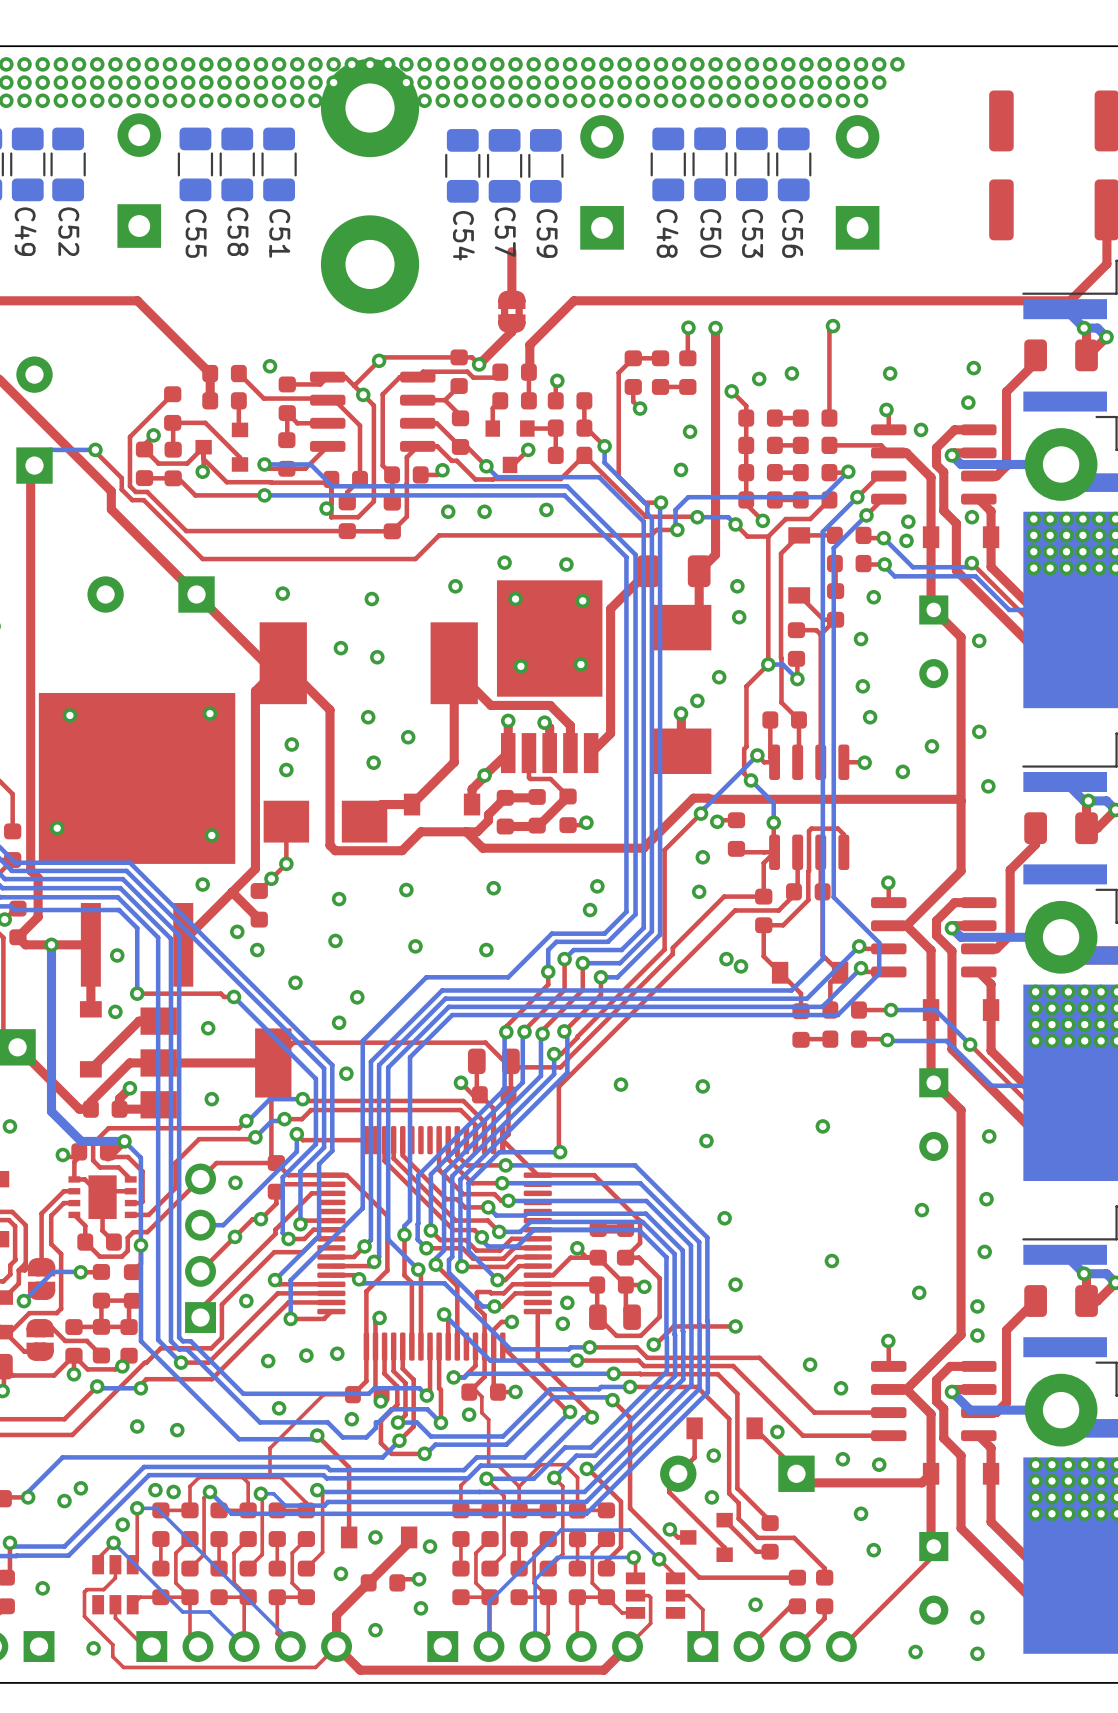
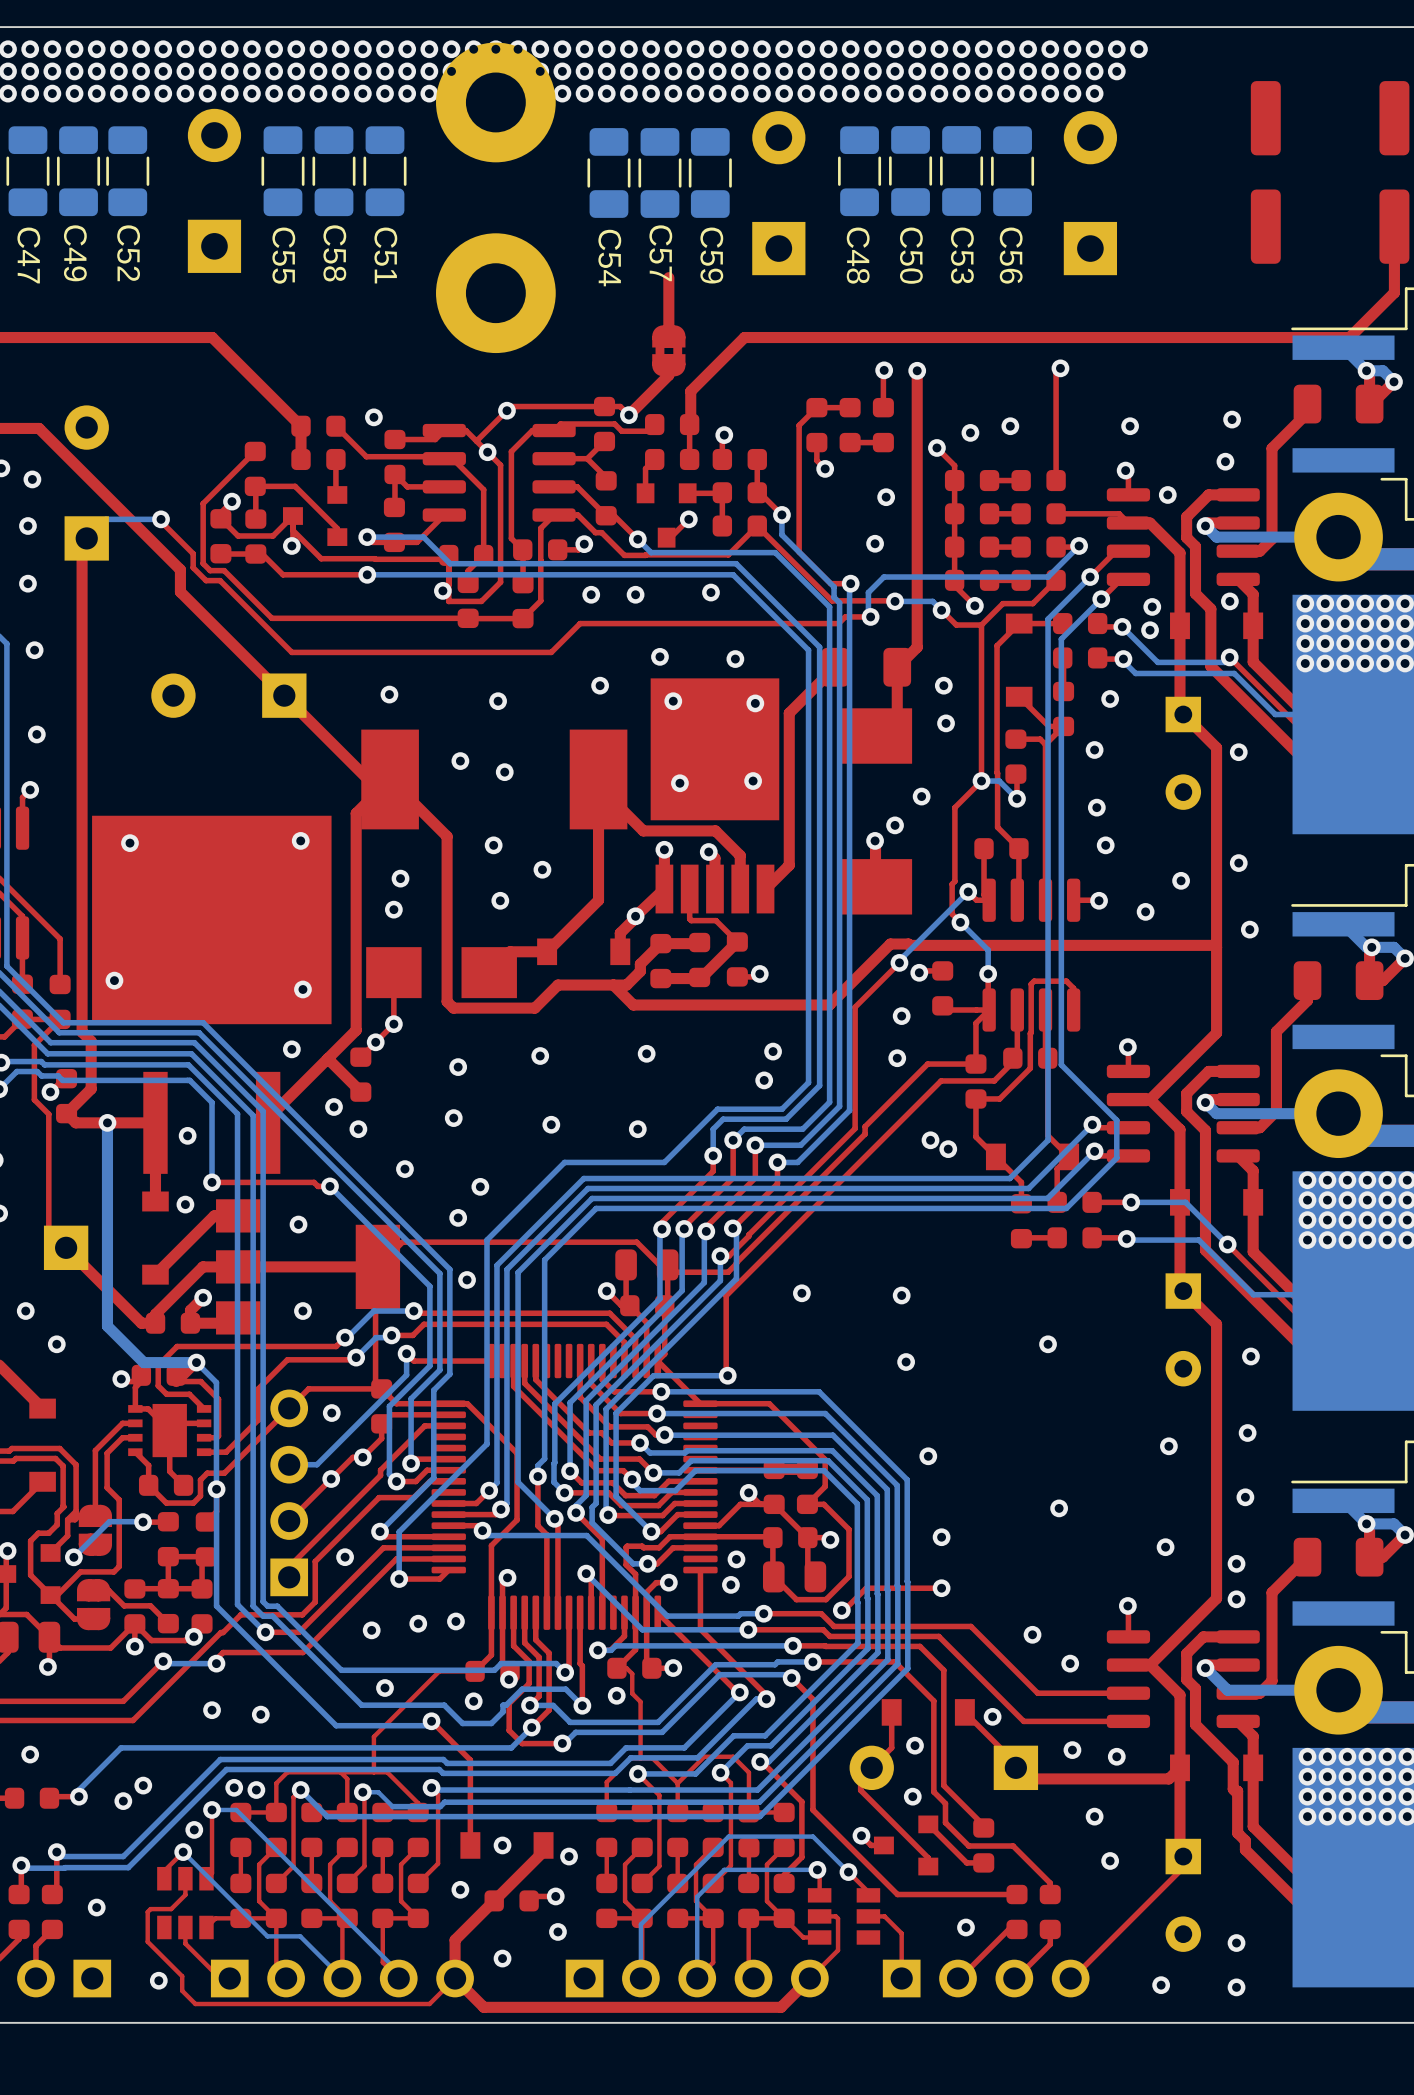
top track: (961, 1455) (961, 1528) (1033, 1601) (1044, 1601) -> (1216, 1745) (1233, 1762) (1233, 1789) (1237, 1791) (1237, 1833) (1245, 1840) (1245, 1849) (1318, 1923)

